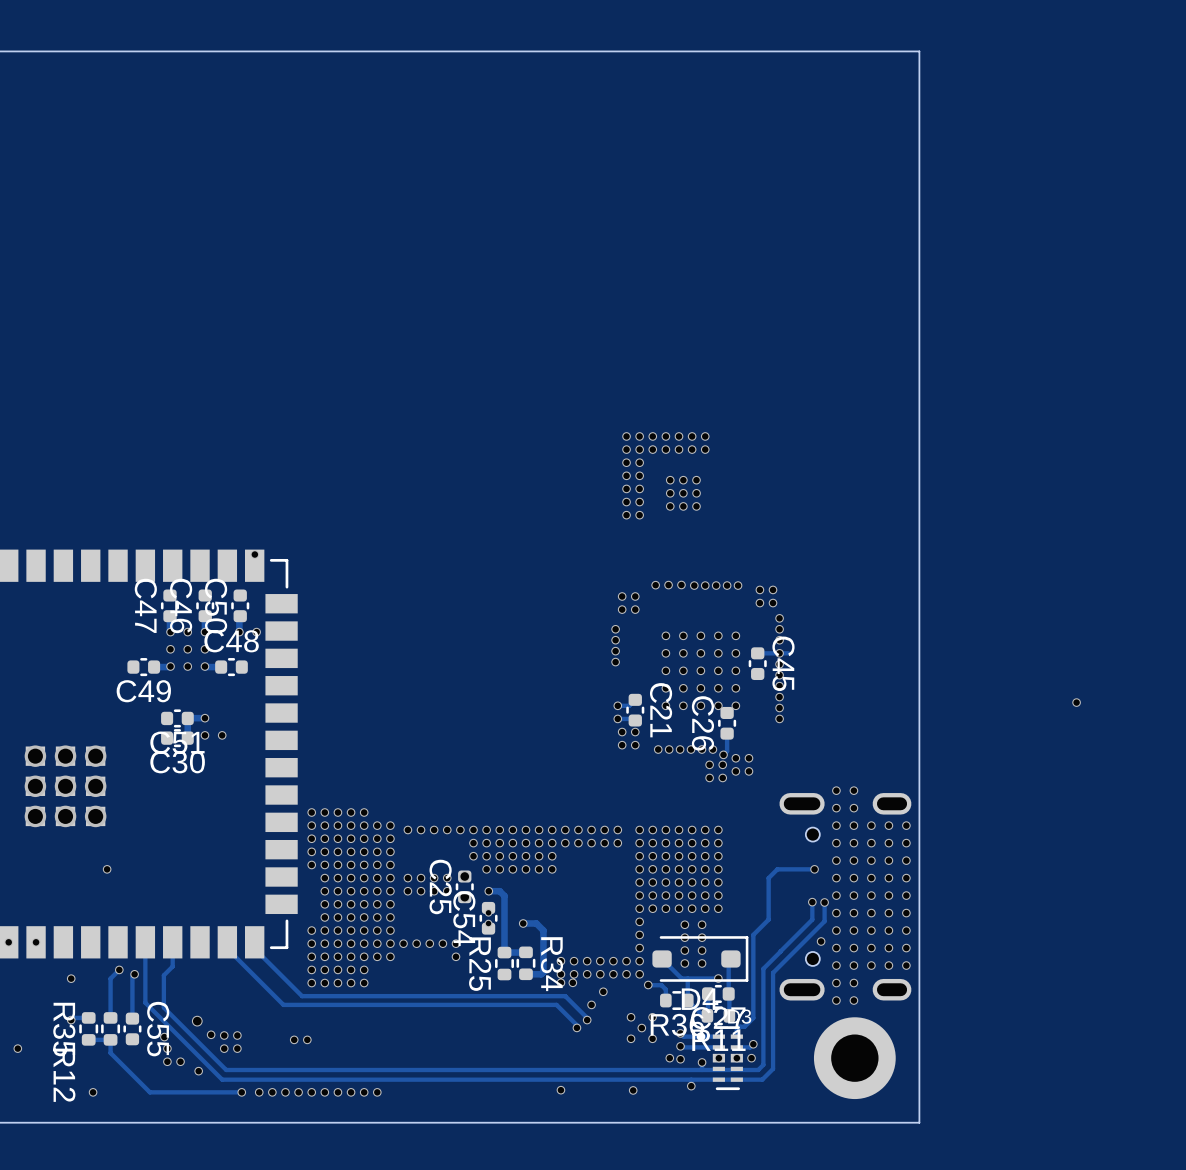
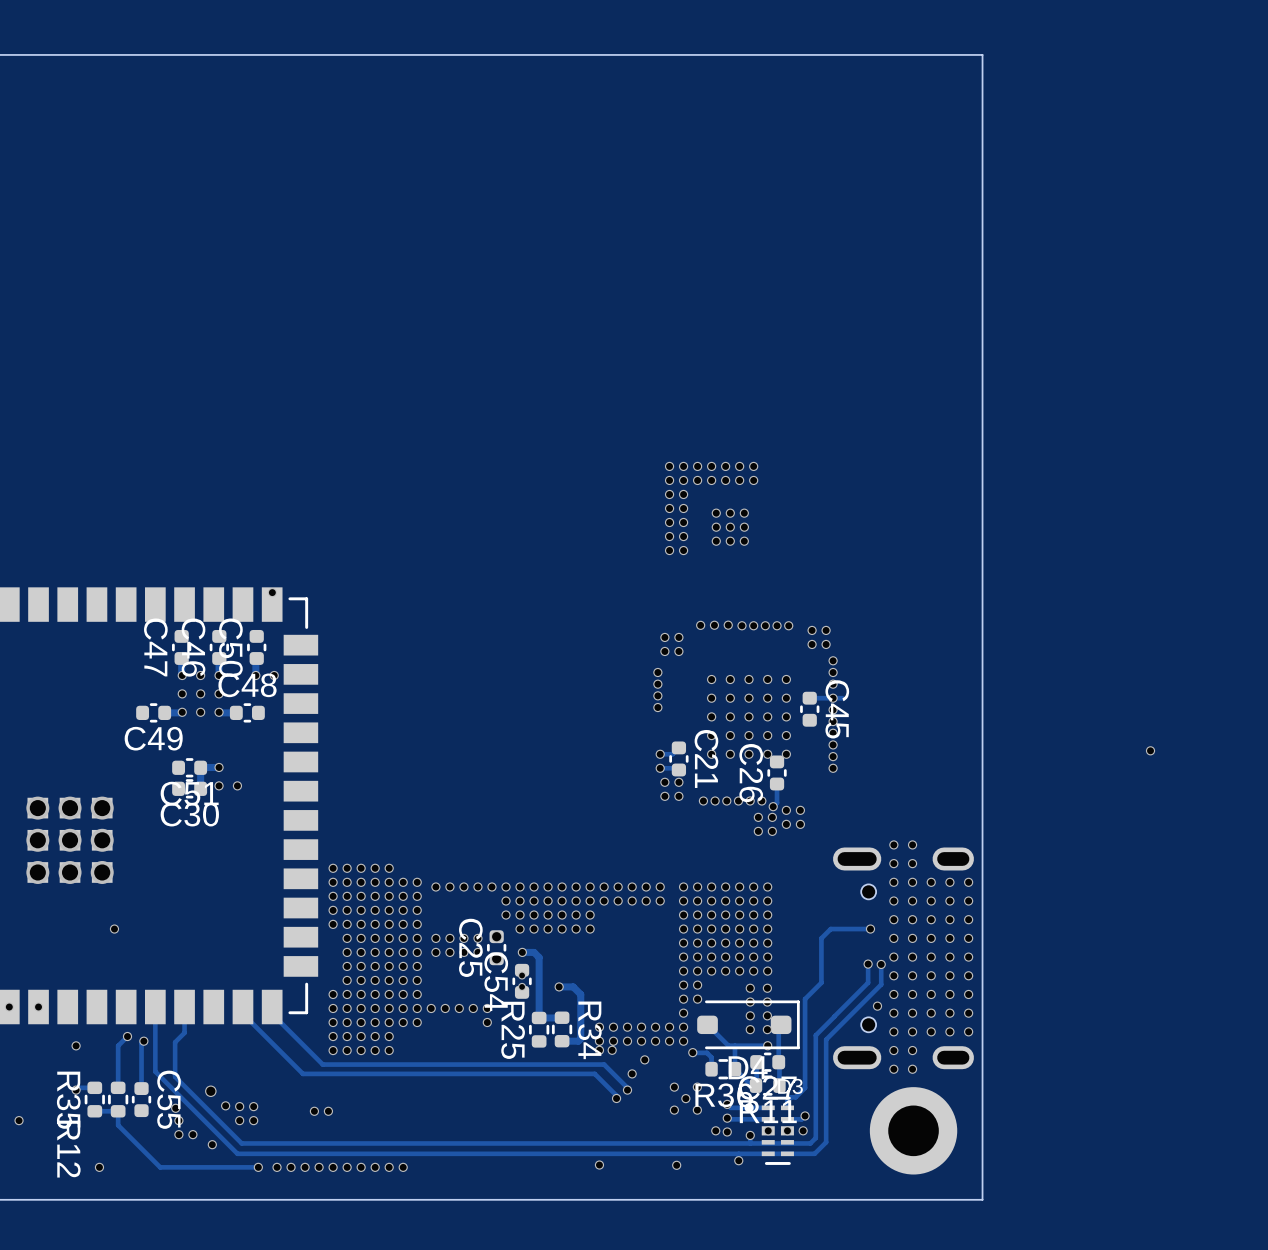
via: none -> (697, 985)
via: (684, 924) -> none
via: none -> (767, 988)
via: none -> (697, 999)
via: (684, 937) -> none
via: none -> (767, 1002)
via: (684, 950) -> none
via: none -> (767, 1015)
via: (684, 963) -> none
via: none -> (767, 1029)

